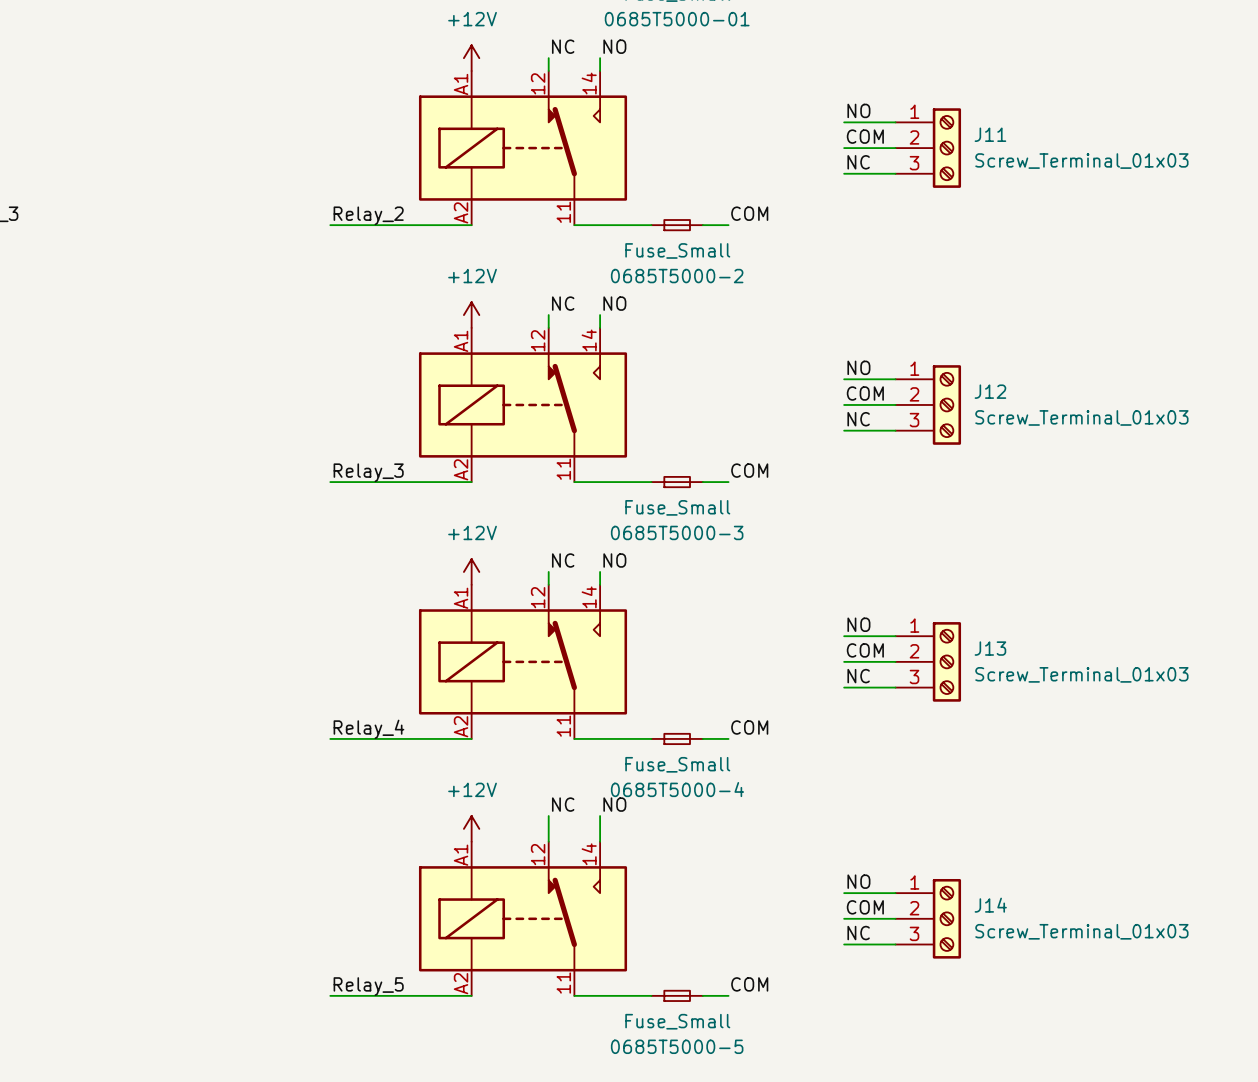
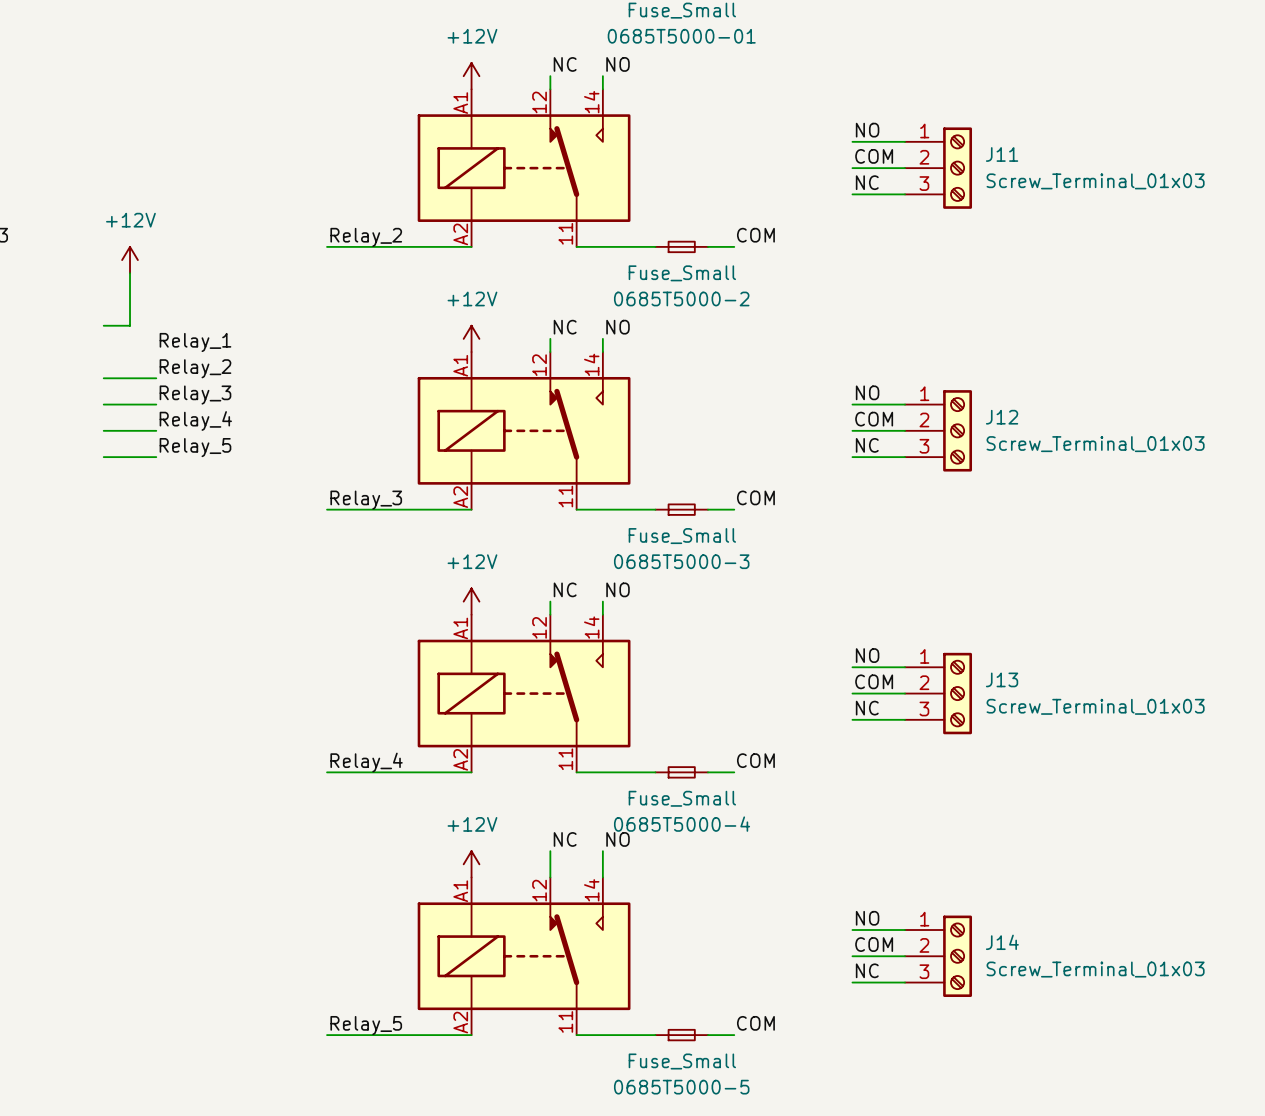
power symbol: none -> +12V (130, 260)
wire: none -> (130, 273) (130, 325) (103, 325)
label: none -> Relay_1 (195, 342)
label: none -> Relay_2 (195, 368)
wire: none -> (103, 378) (156, 378)
label: none -> Relay_3 (195, 395)
wire: none -> (103, 404) (156, 404)
label: none -> Relay_4 (195, 420)
wire: none -> (103, 430) (156, 430)
label: none -> Relay_5 (195, 447)
wire: none -> (103, 457) (156, 457)

